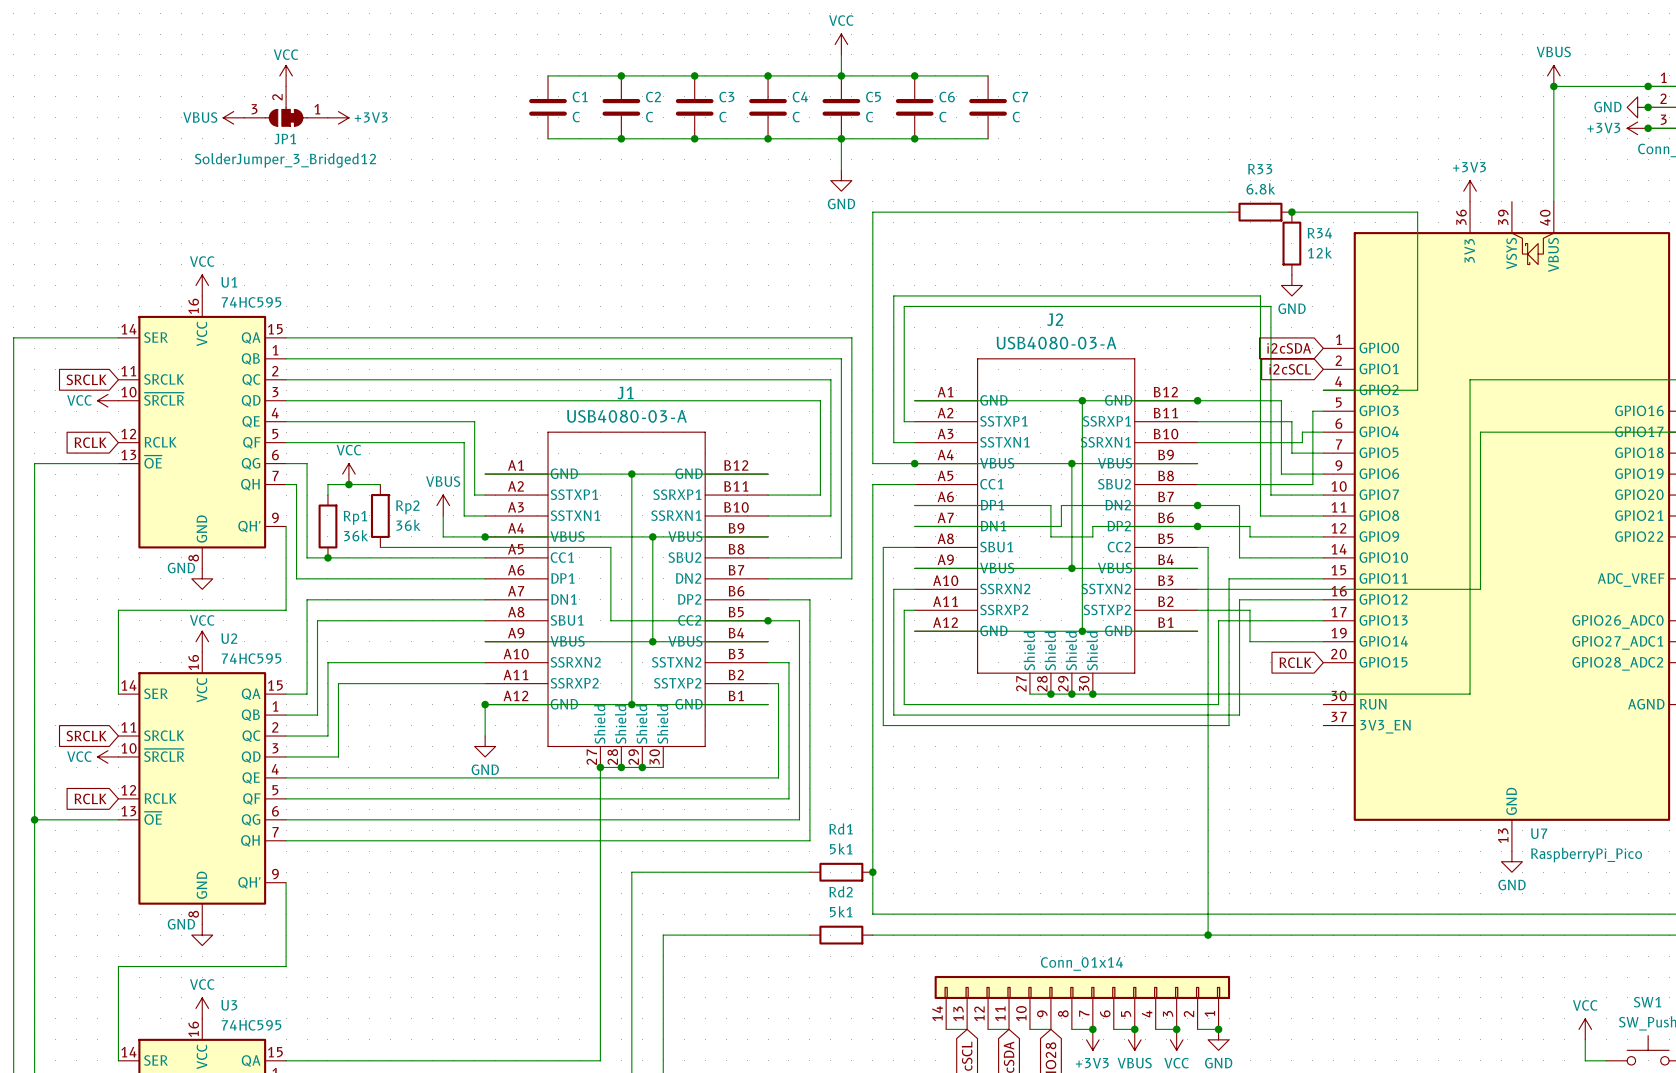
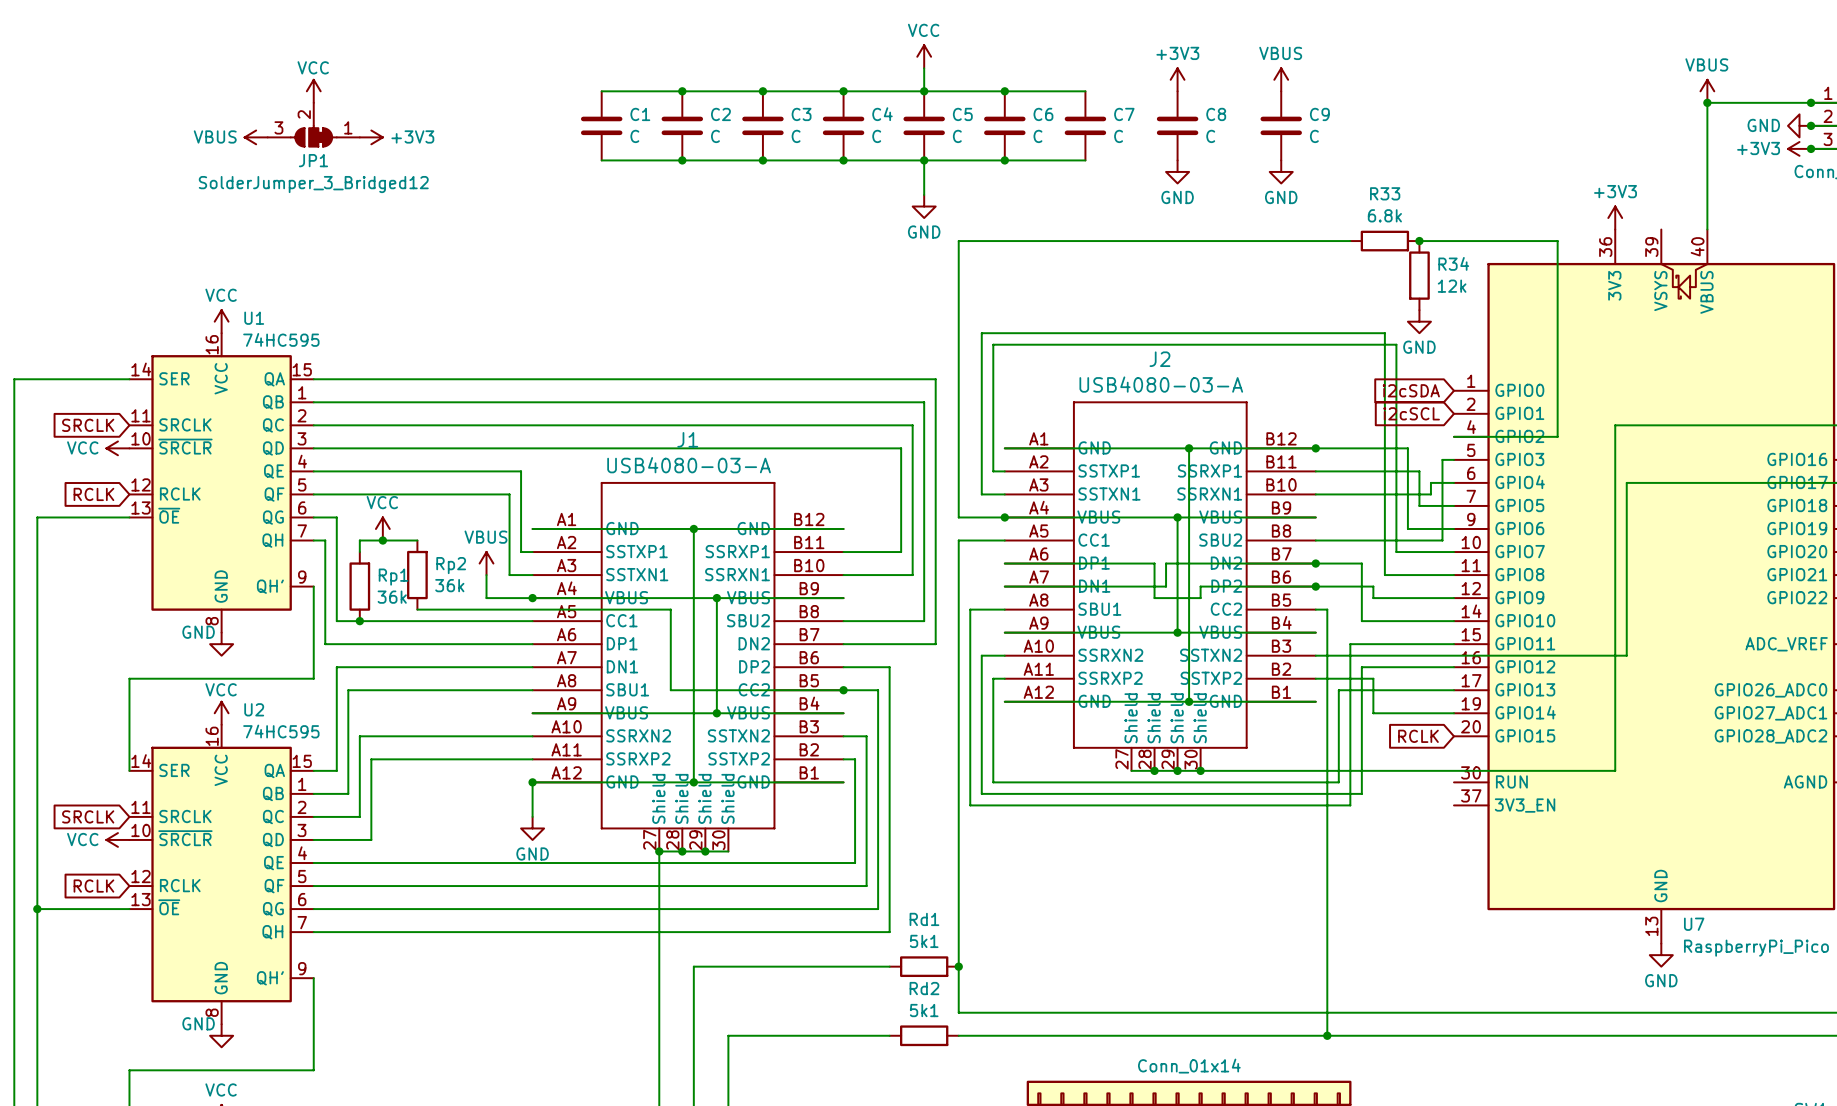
power symbol: none -> +3V3 (1177, 79)
power symbol: none -> VBUS (1281, 79)
C8: none -> C (1177, 125)
C9: none -> C (1281, 125)
power symbol: none -> GND (1177, 171)
power symbol: none -> GND (1281, 171)

